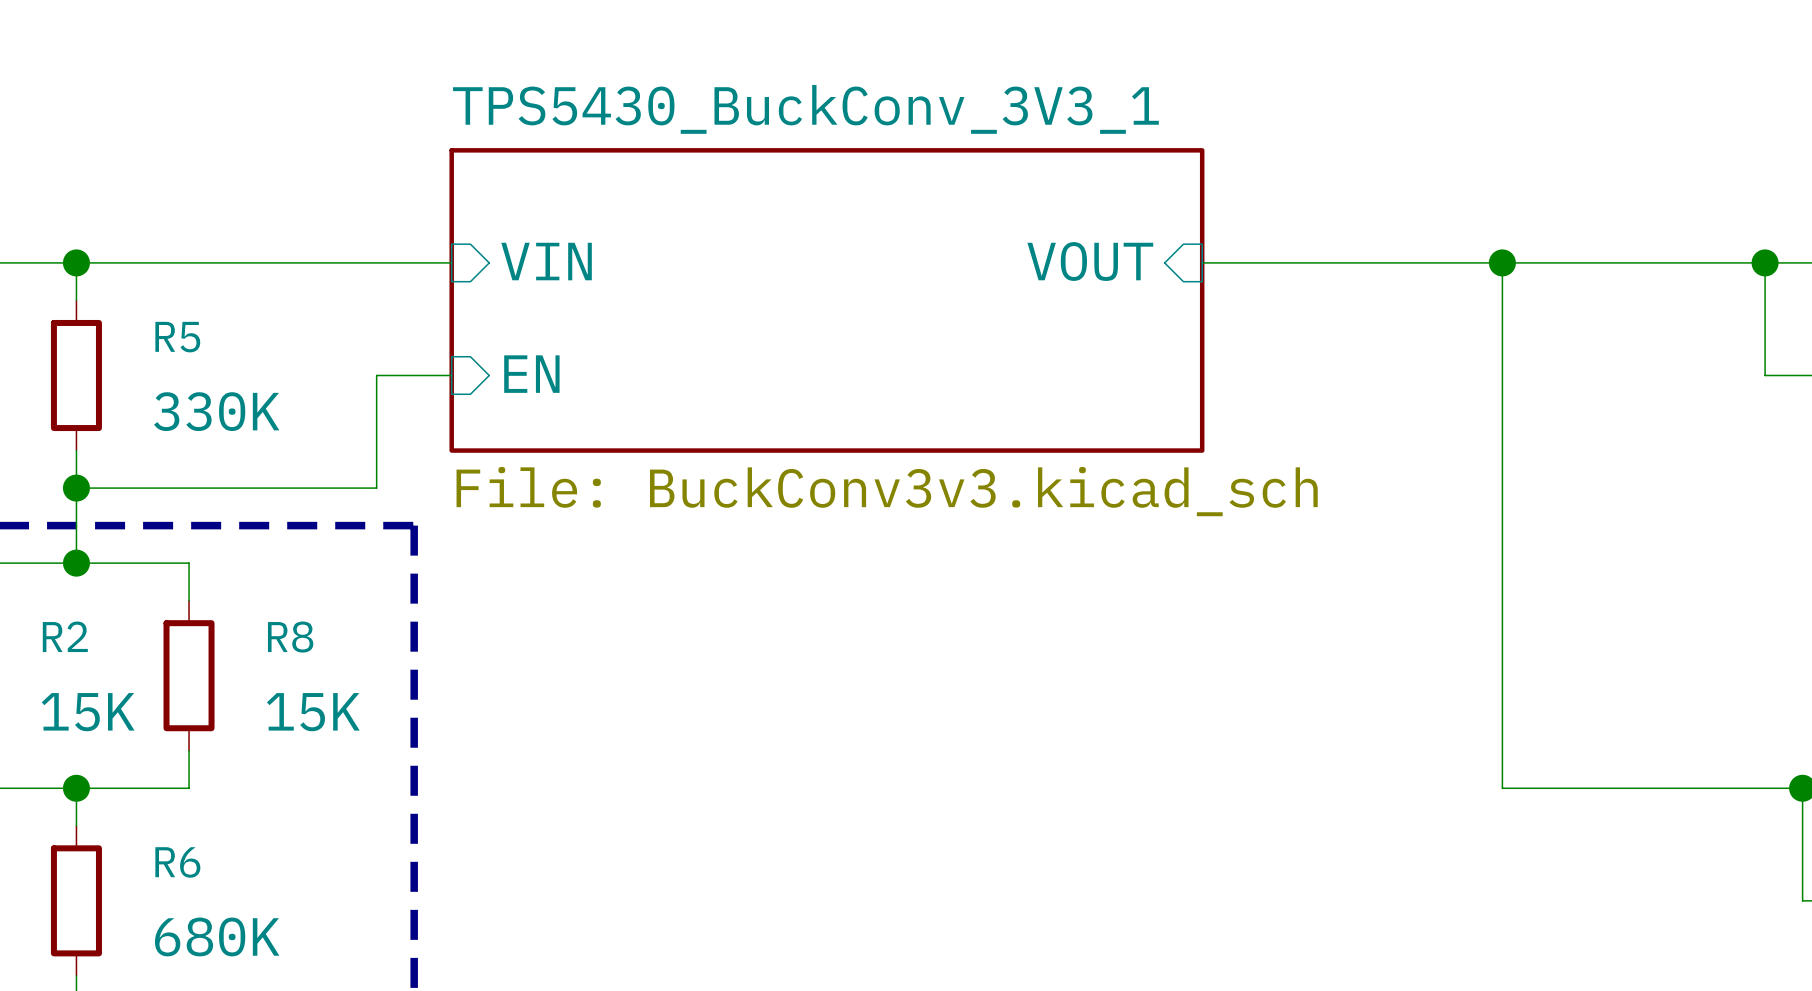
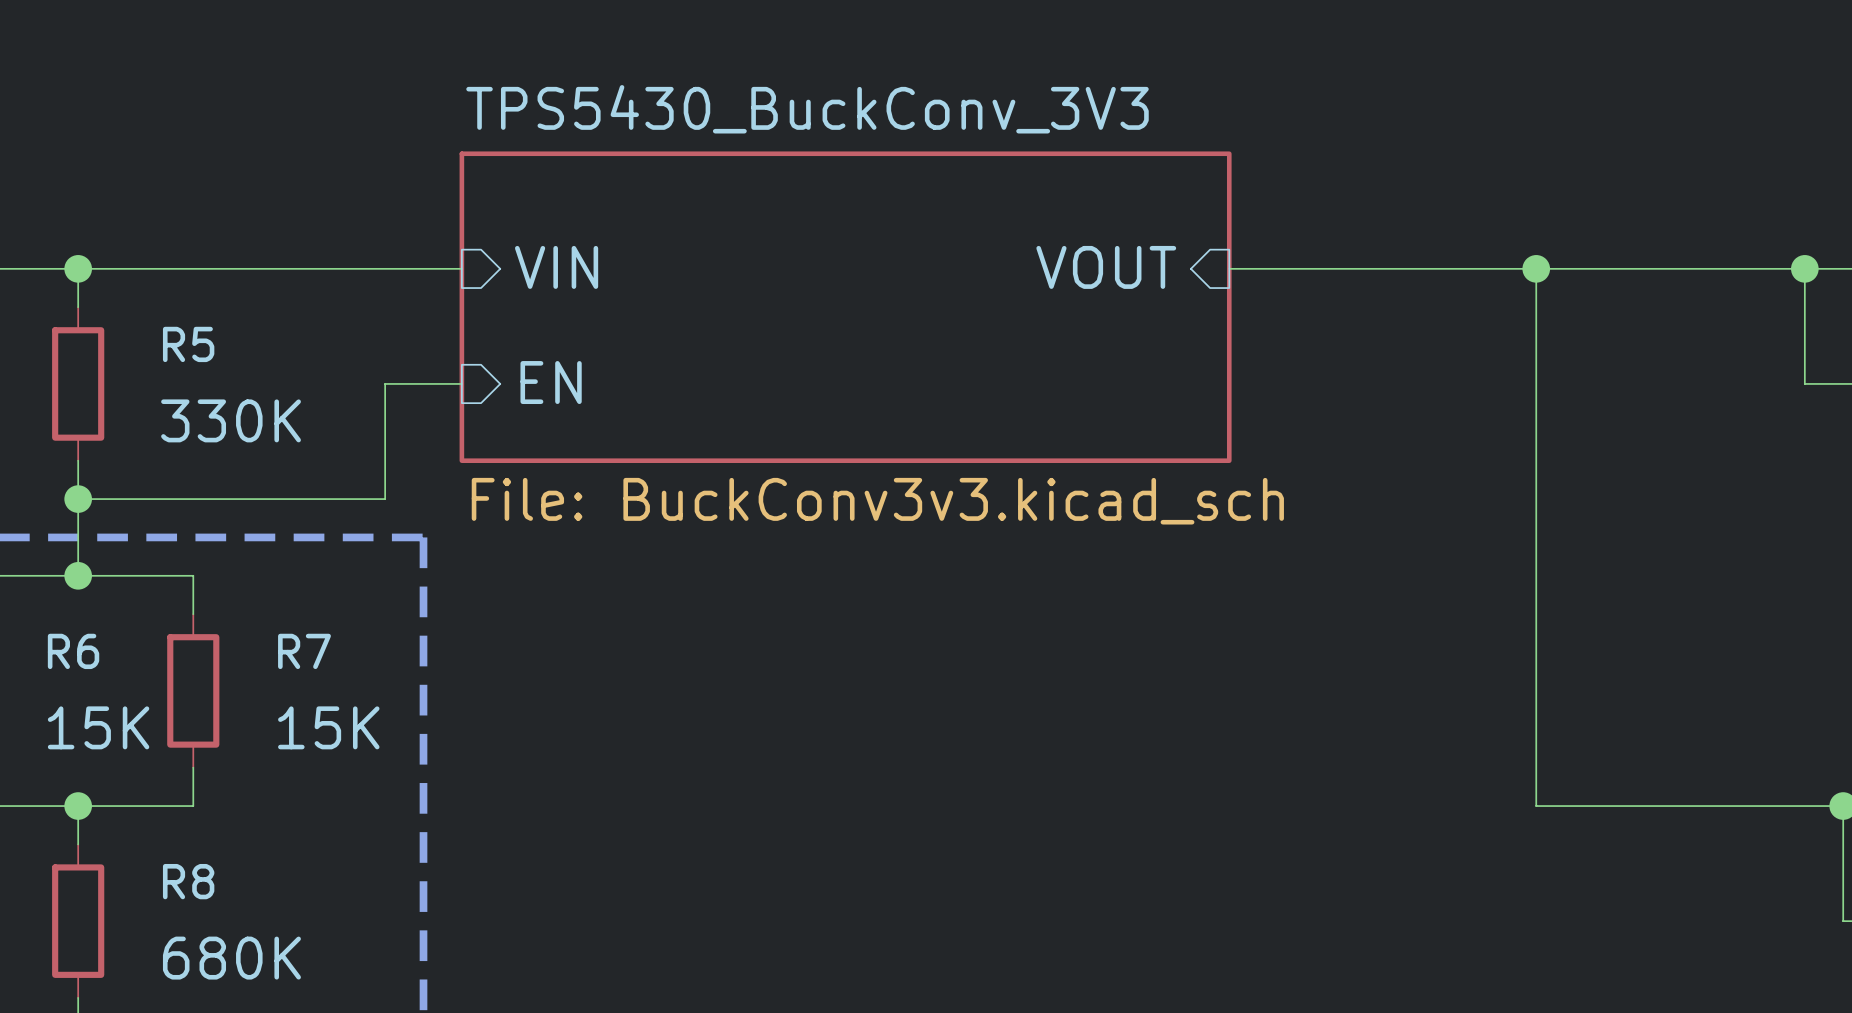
sheet TPS5430_BuckConv_3V3_1 name: TPS5430_BuckConv_3V3_1 (805, 109) -> TPS5430_BuckConv_3V3 (807, 109)
R2 name: R2 (65, 636) -> R6 (73, 651)
R8 name: R8 (290, 637) -> R7 (304, 651)
R6 name: R6 (177, 862) -> R8 (188, 881)

